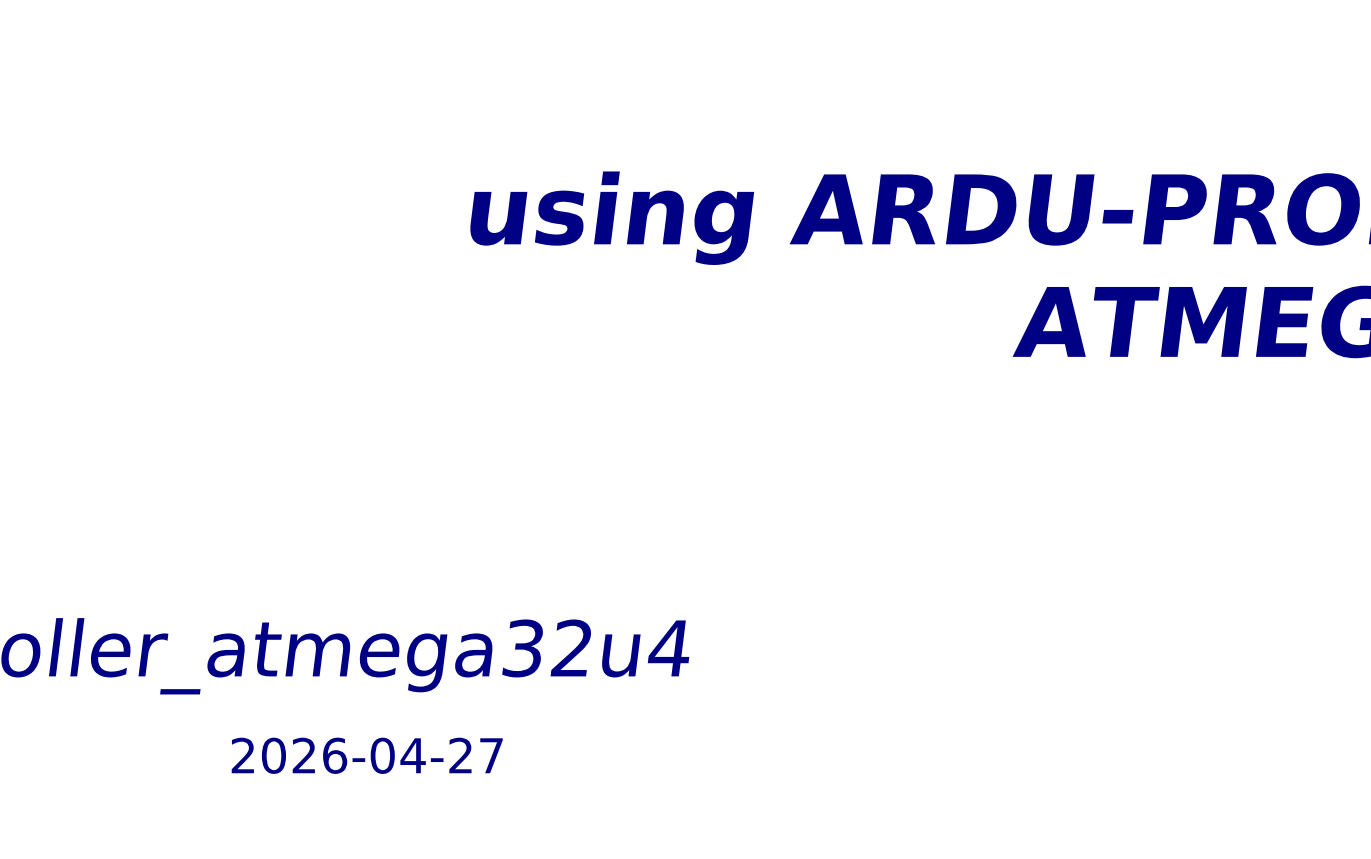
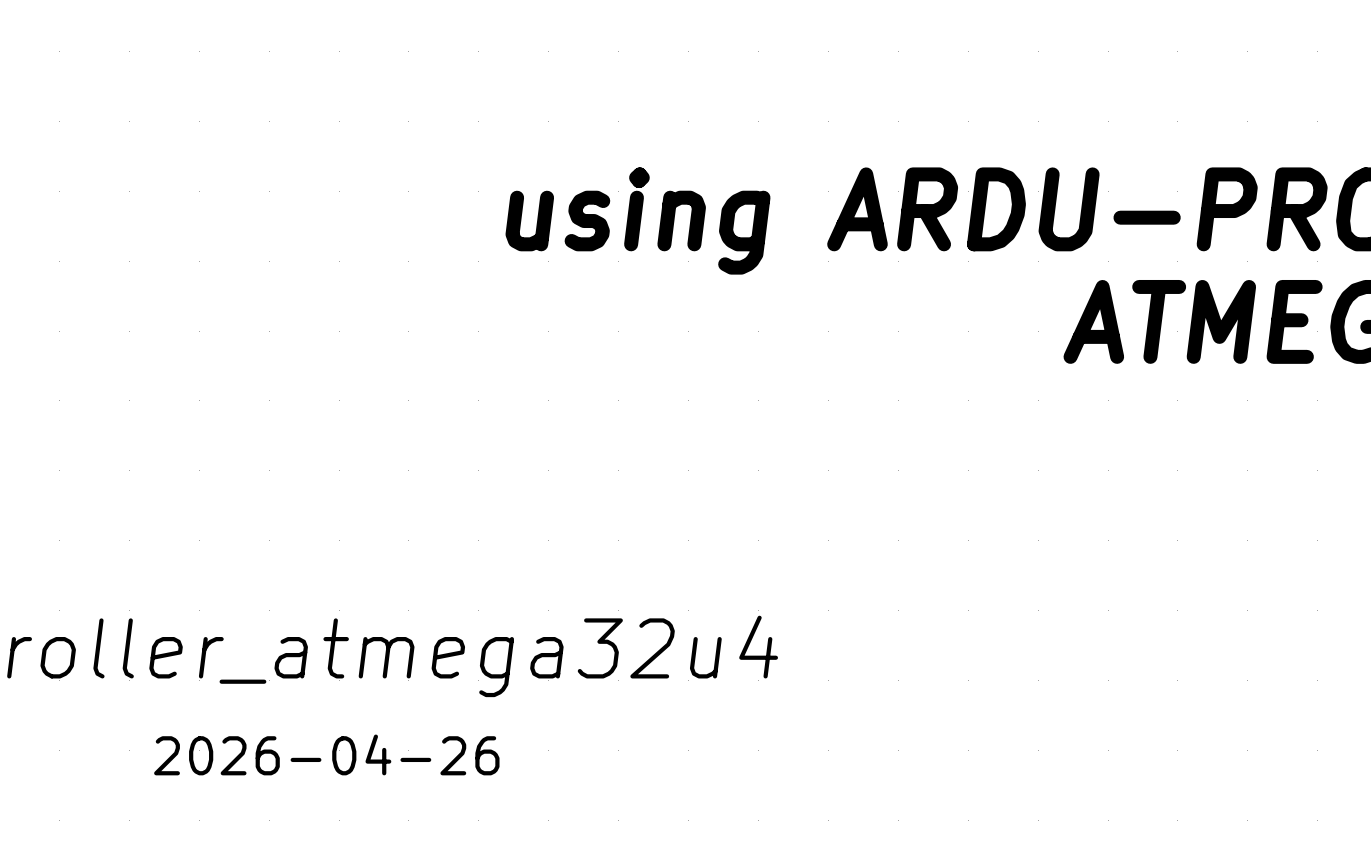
text: 2026-04-27 (367, 755) -> 2026-04-26 (326, 754)

